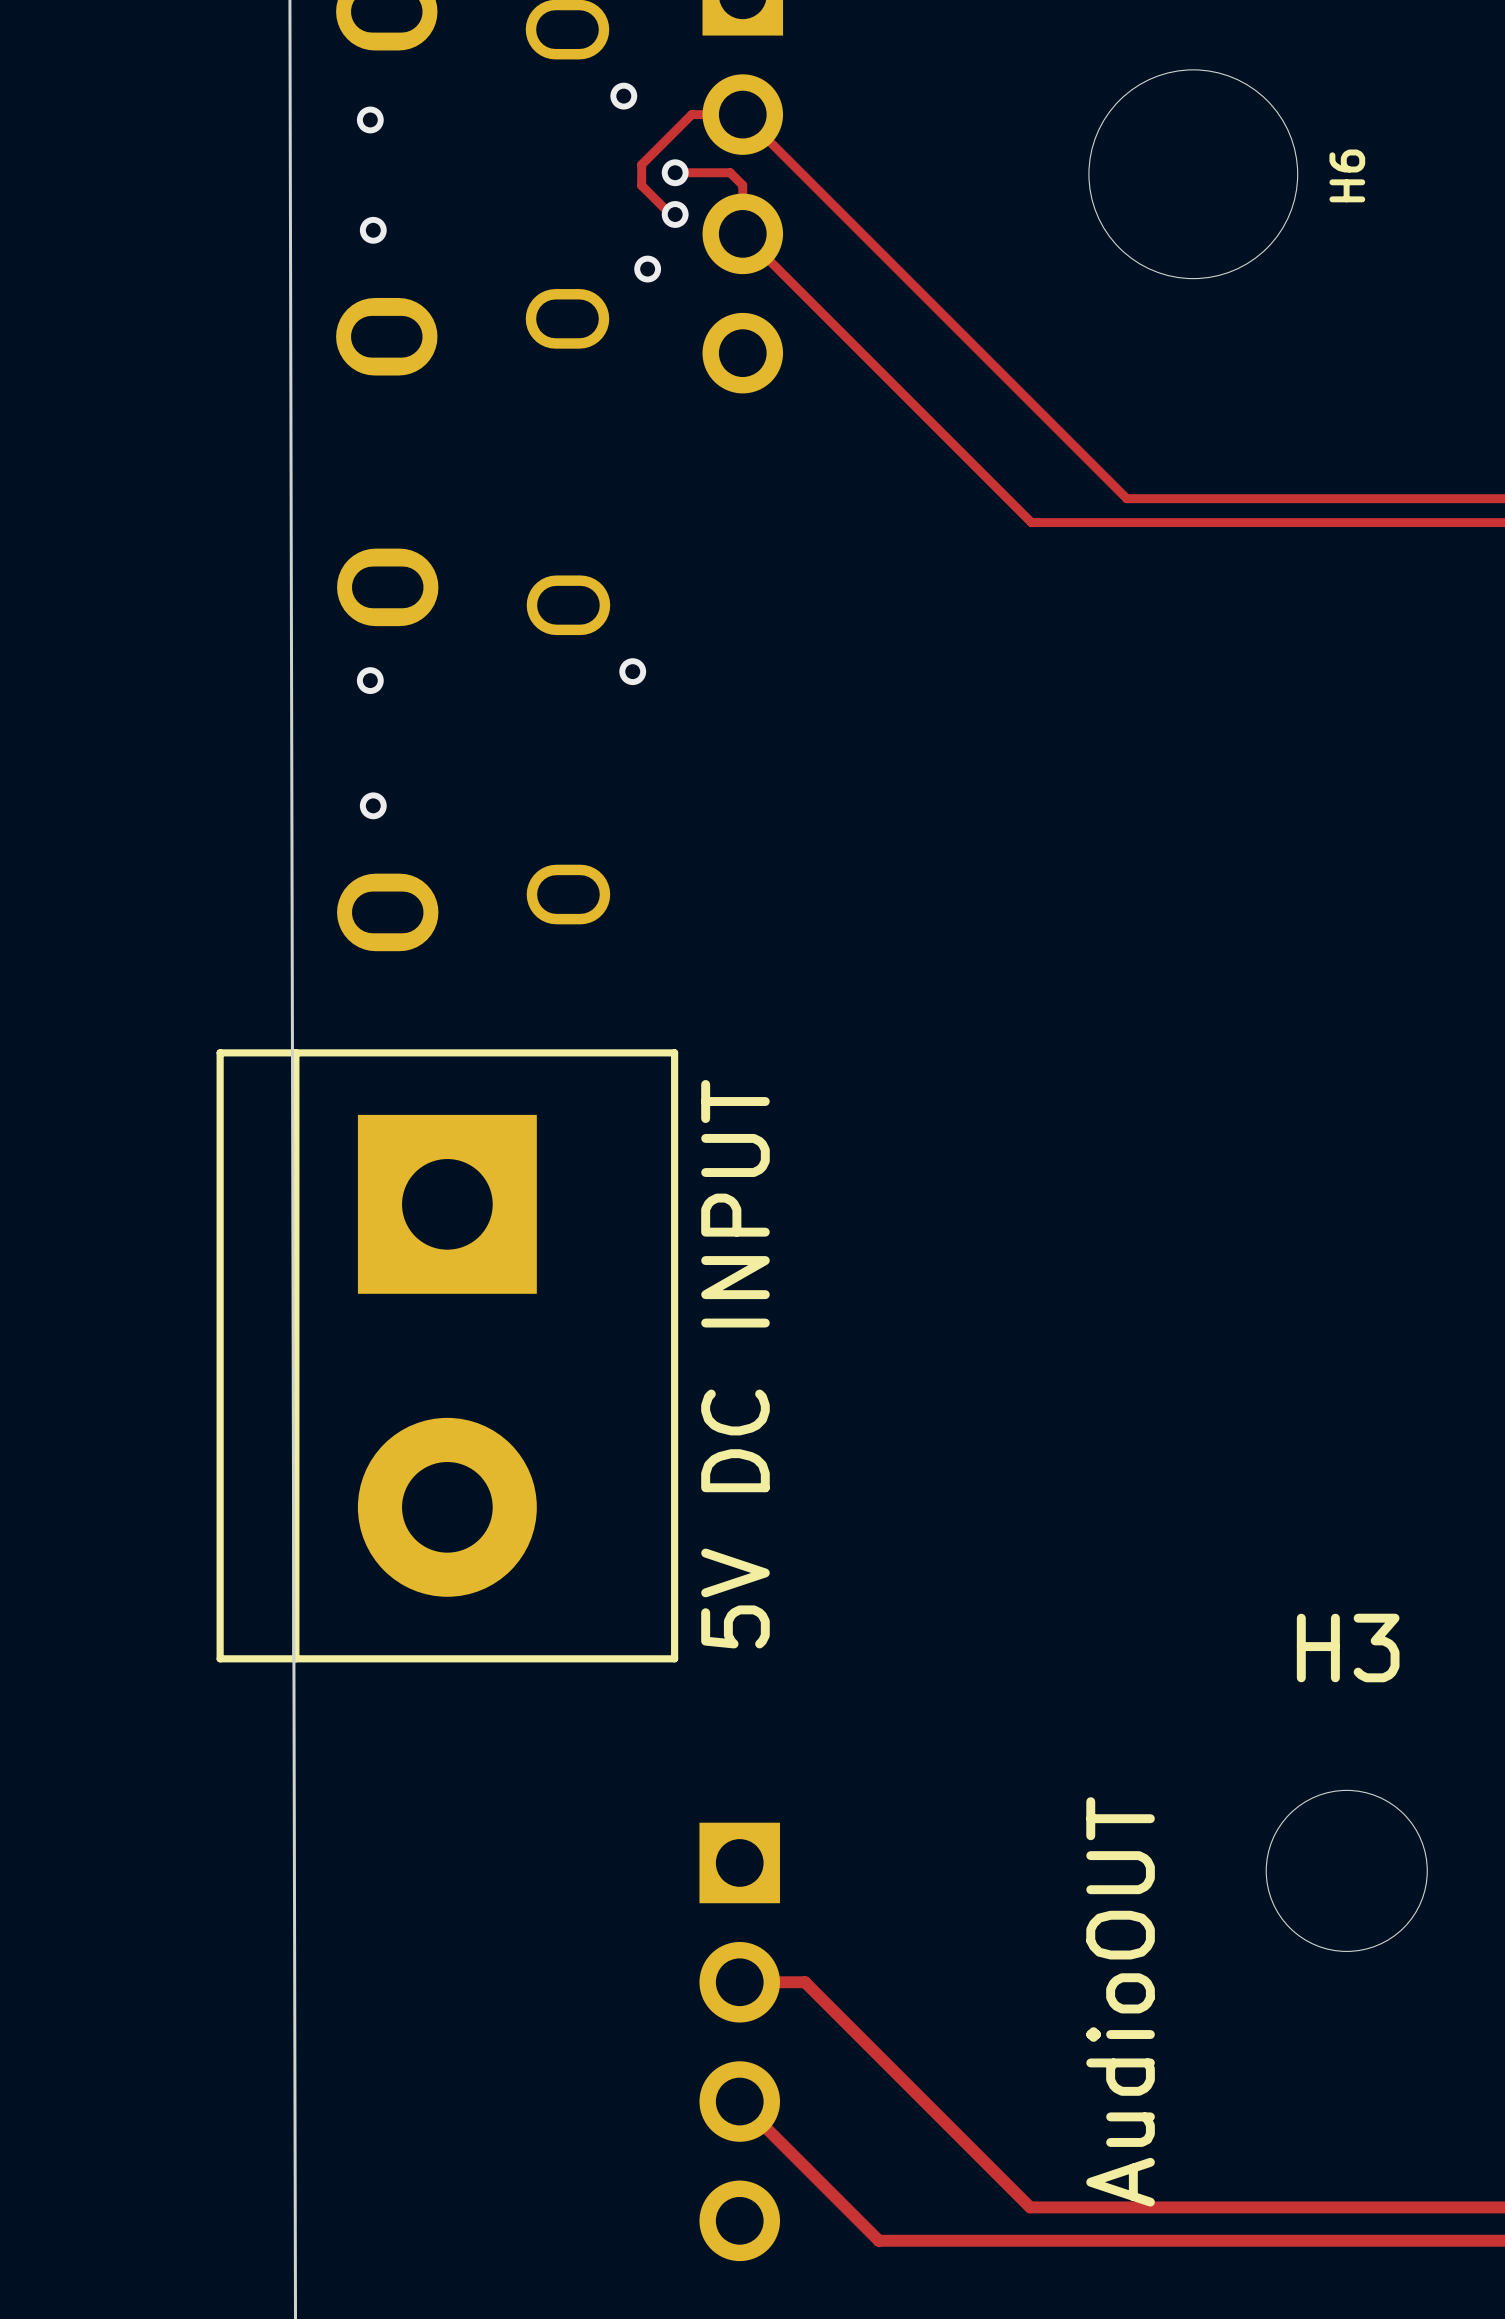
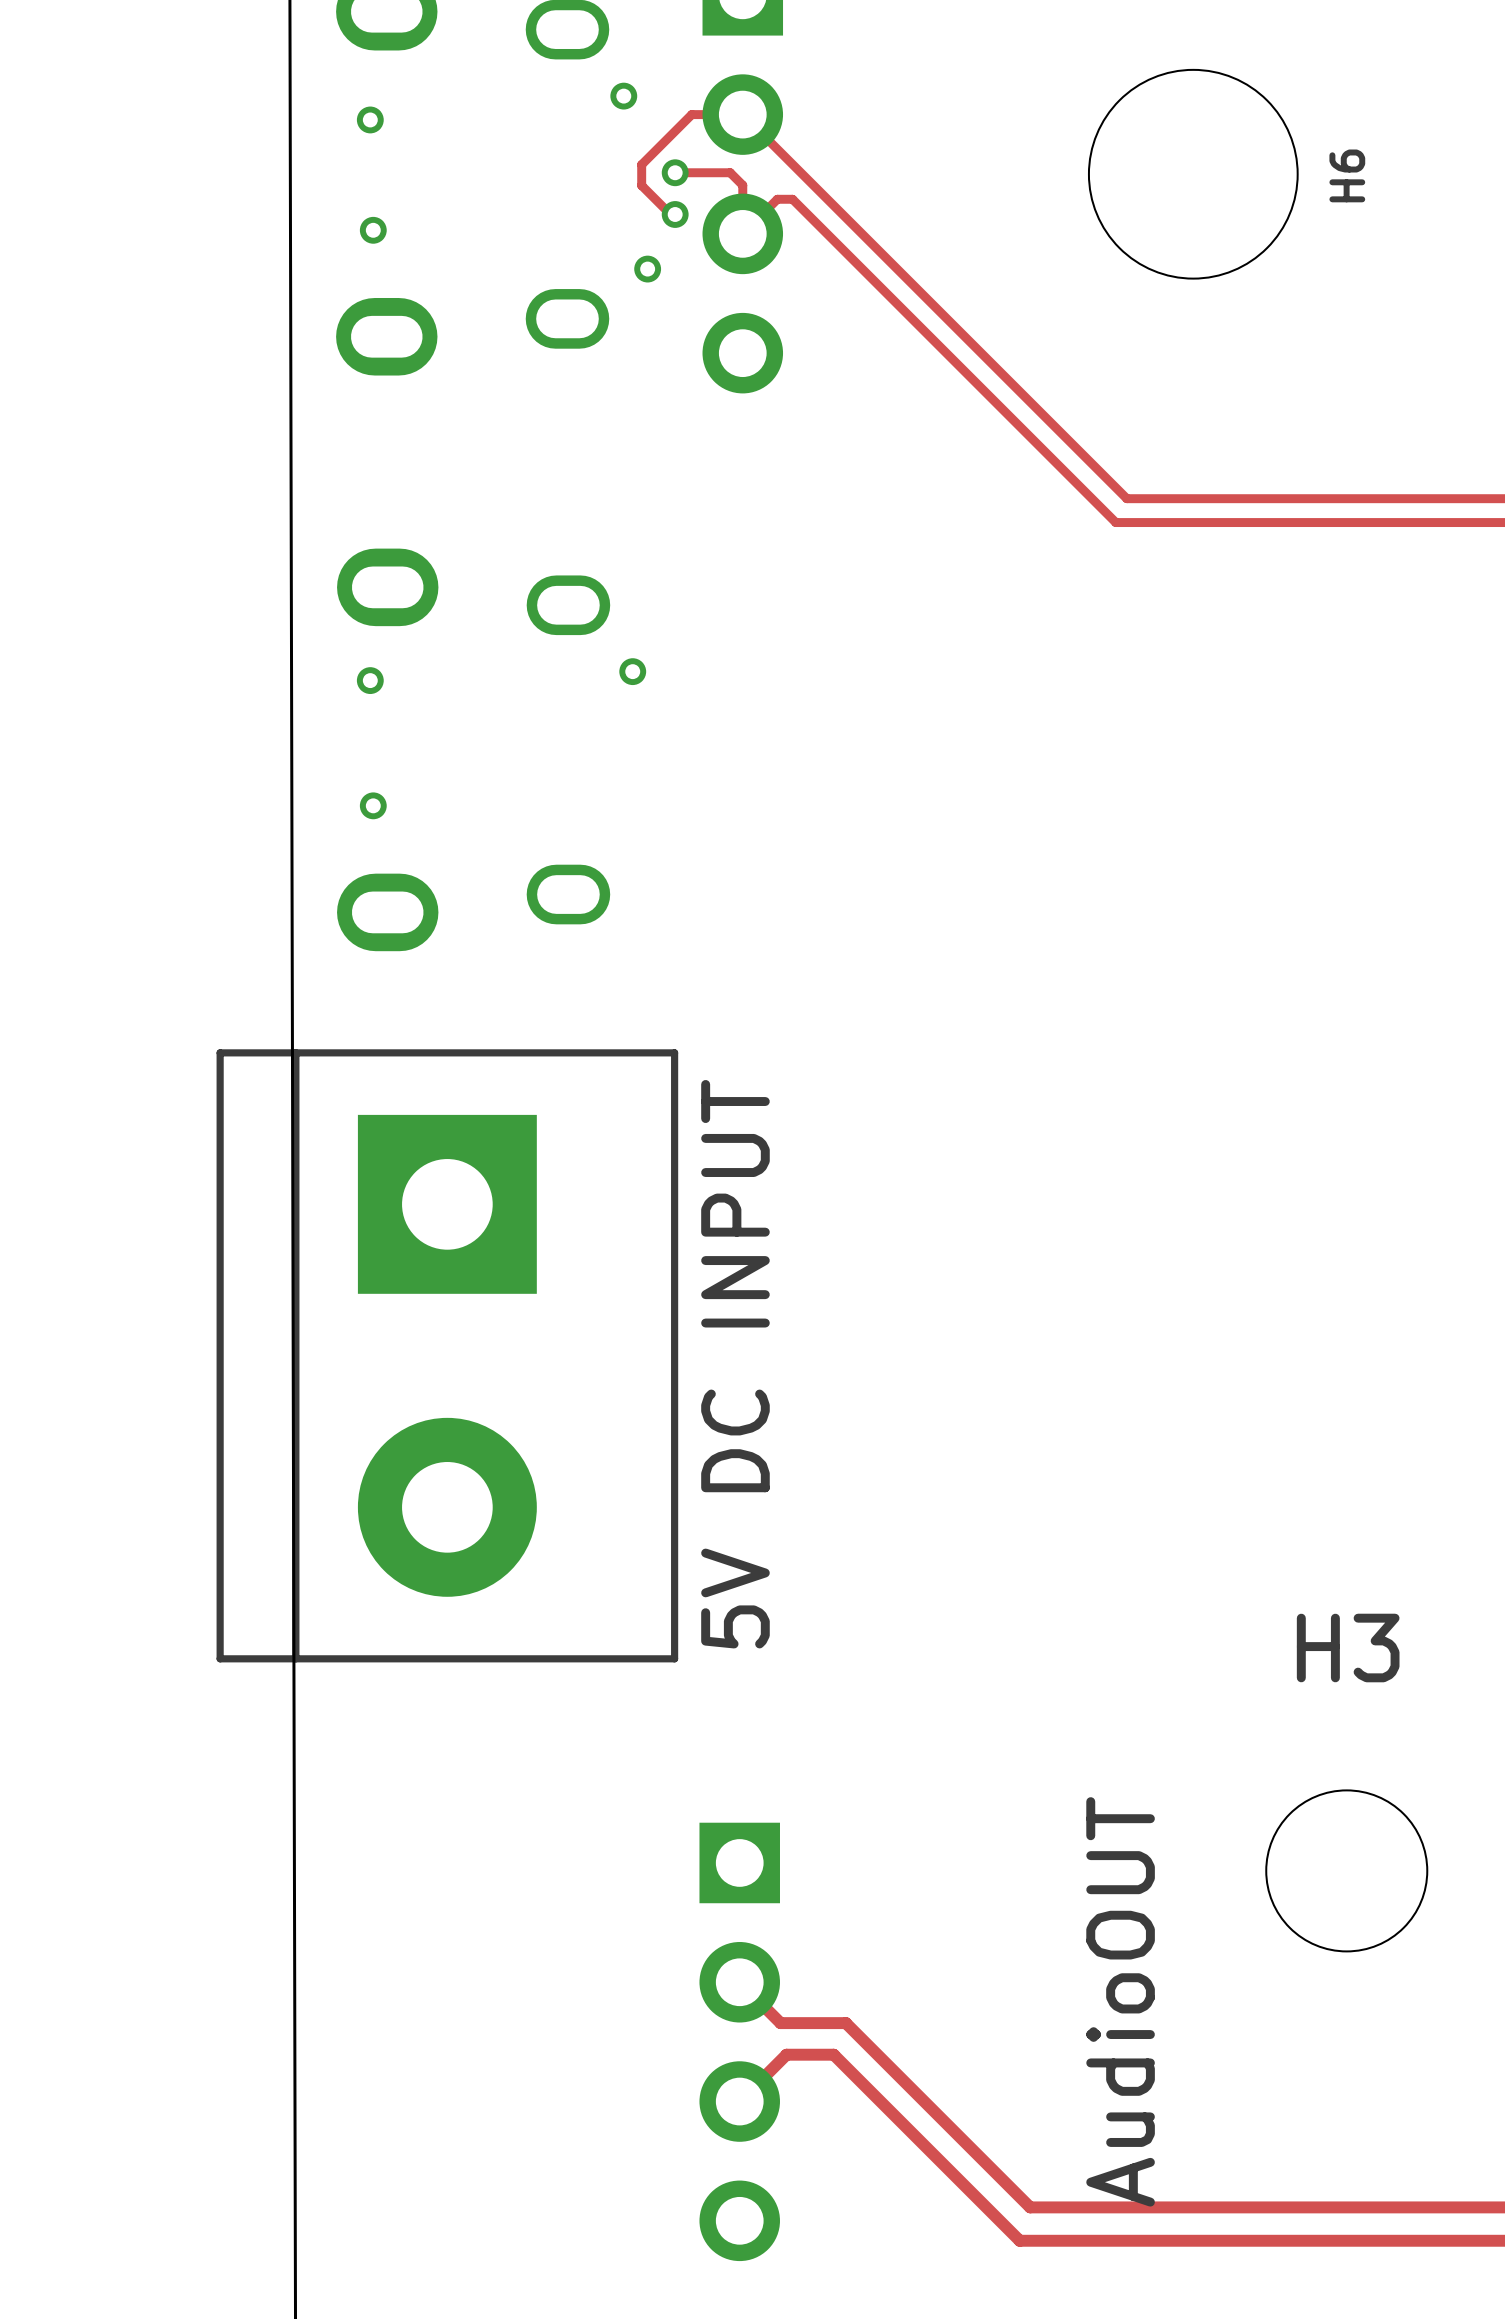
track: (742, 233) (1031, 522) (1115, 522) -> (742, 233) (777, 199) (792, 199) (1115, 522)
track: (739, 1982) (805, 1982) (845, 2023) -> (739, 1982) (780, 2023) (845, 2023)
track: (739, 2101) (878, 2240) (1019, 2240) -> (739, 2101) (786, 2054) (833, 2054) (1019, 2240)

